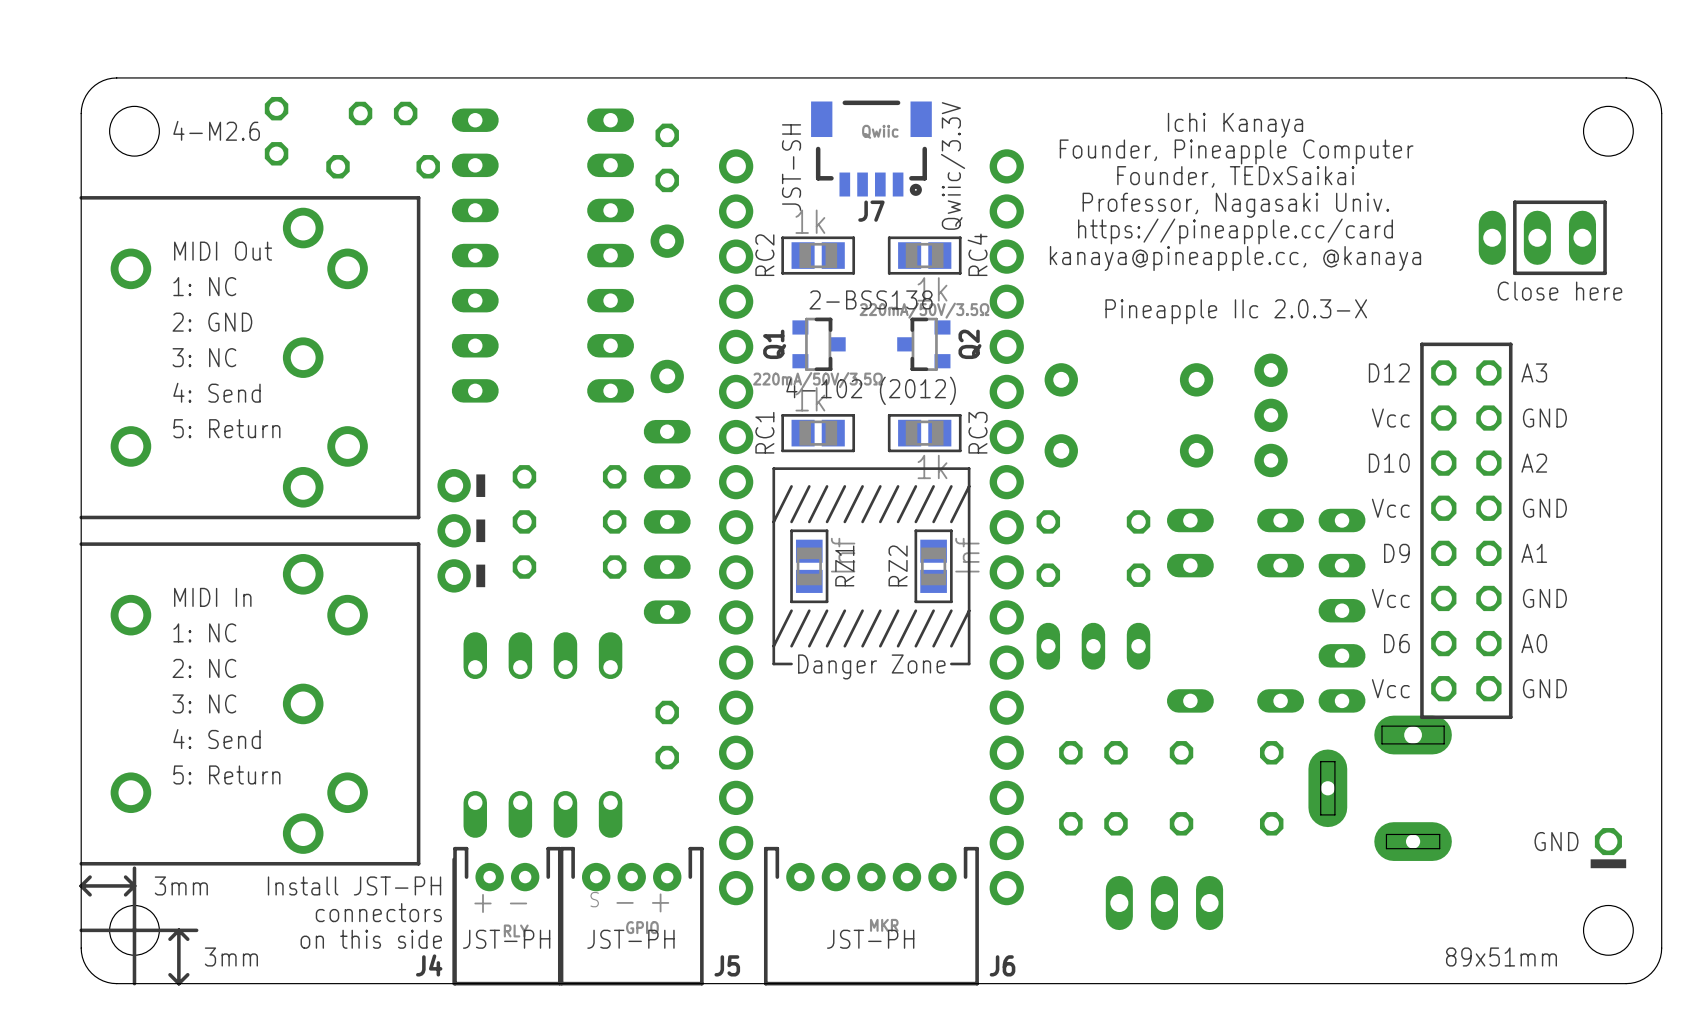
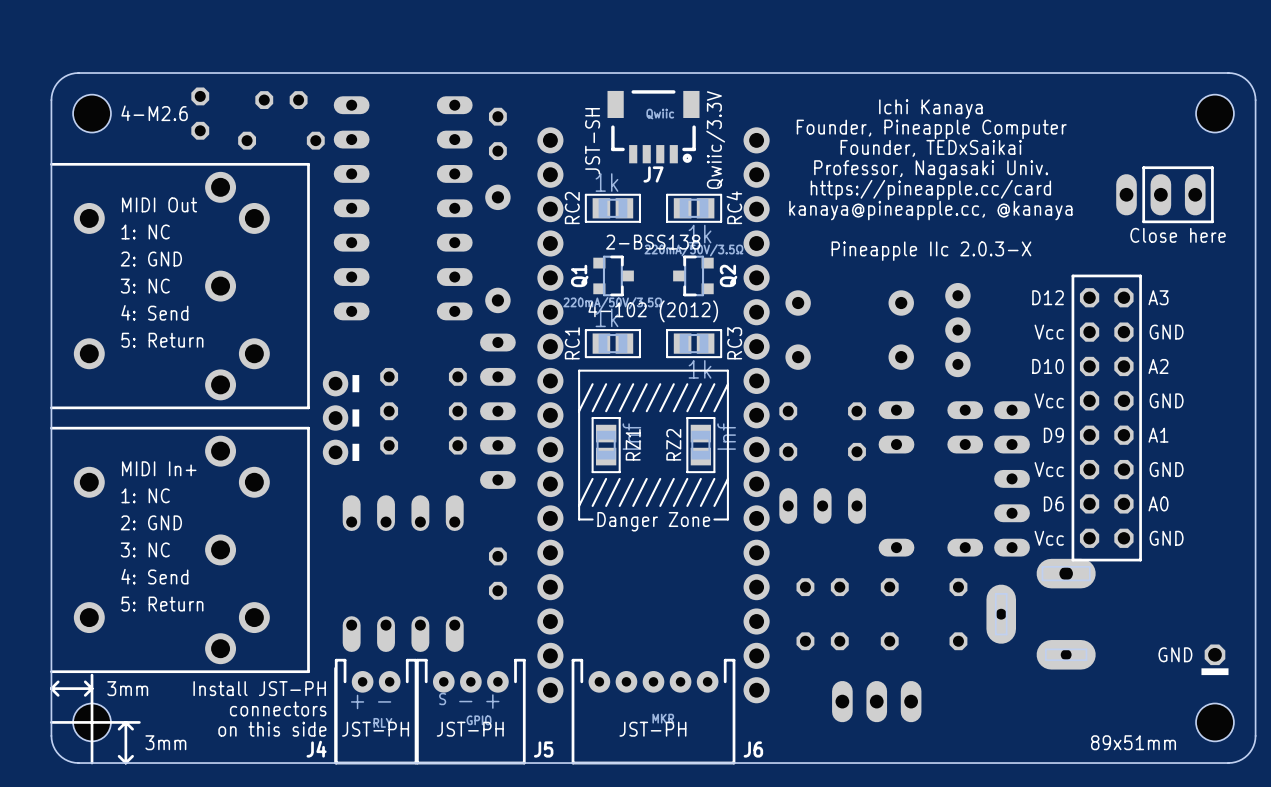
text: MIDI In (212, 597) -> MIDI In+ (159, 468)
text: 2: NC (204, 668) -> 2: GND (151, 522)

